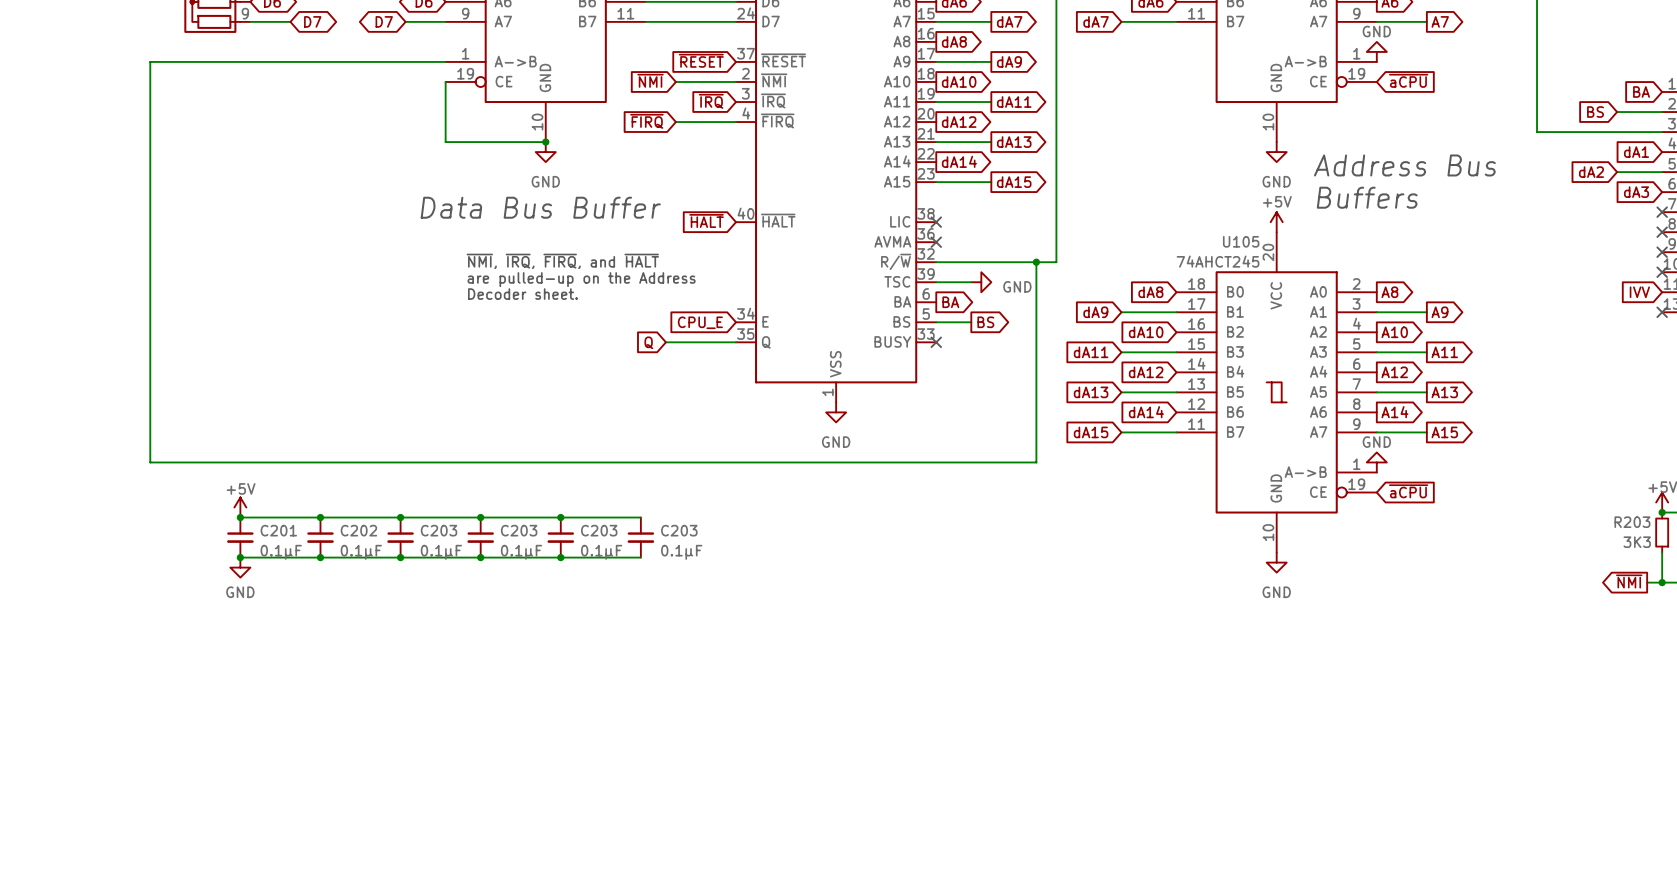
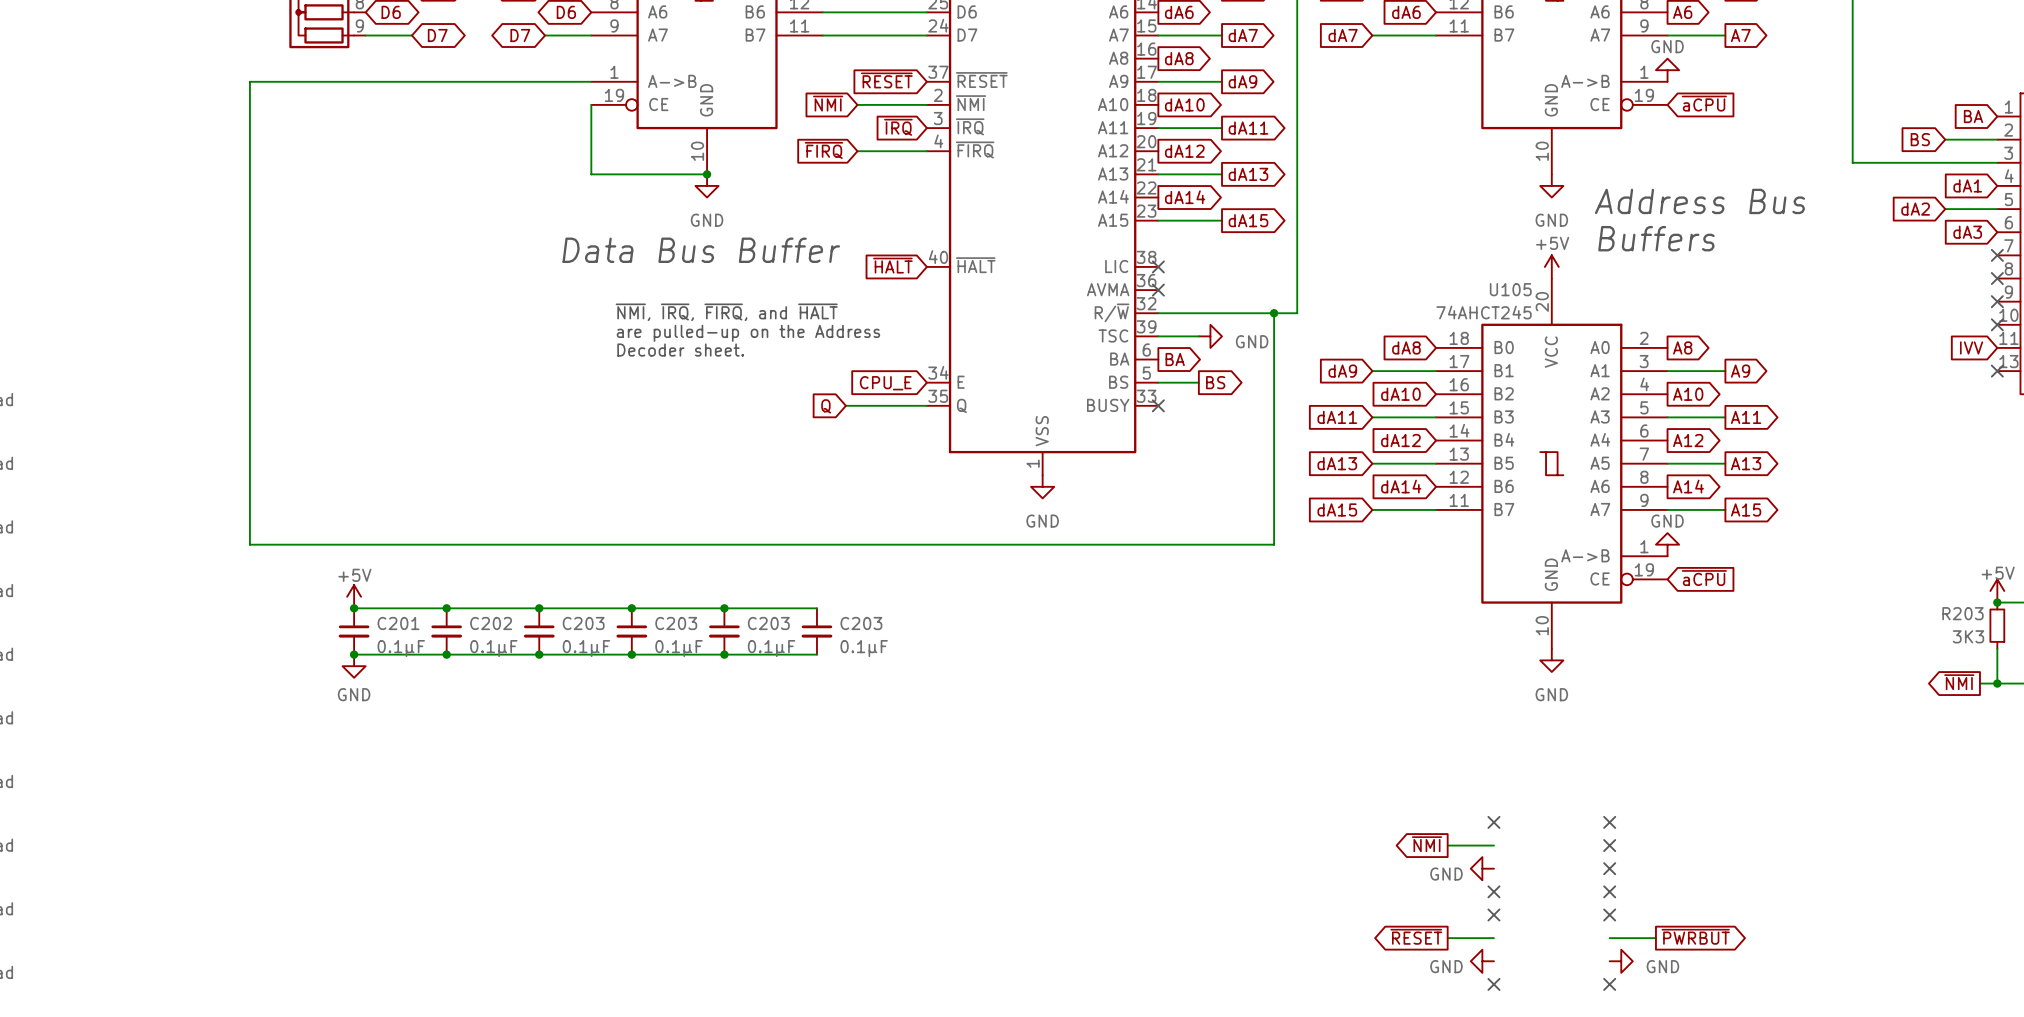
no-connect mark: none -> (1493, 822)
no-connect mark: none -> (1609, 822)
global label: none -> ~{NMI} (1426, 844)
wire: none -> (1447, 845) (1493, 845)
no-connect mark: none -> (1609, 845)
power symbol: none -> GND (1482, 868)
no-connect mark: none -> (1609, 868)
no-connect mark: none -> (1493, 891)
no-connect mark: none -> (1609, 891)
no-connect mark: none -> (1493, 914)
no-connect mark: none -> (1609, 914)
global label: none -> ~{RESET} (1416, 936)
global label: none -> ~{PWRBUT} (1695, 936)
wire: none -> (1447, 938) (1493, 938)
wire: none -> (1609, 938) (1655, 938)
power symbol: none -> GND (1482, 961)
power symbol: none -> GND (1621, 961)
no-connect mark: none -> (1493, 984)
no-connect mark: none -> (1609, 984)

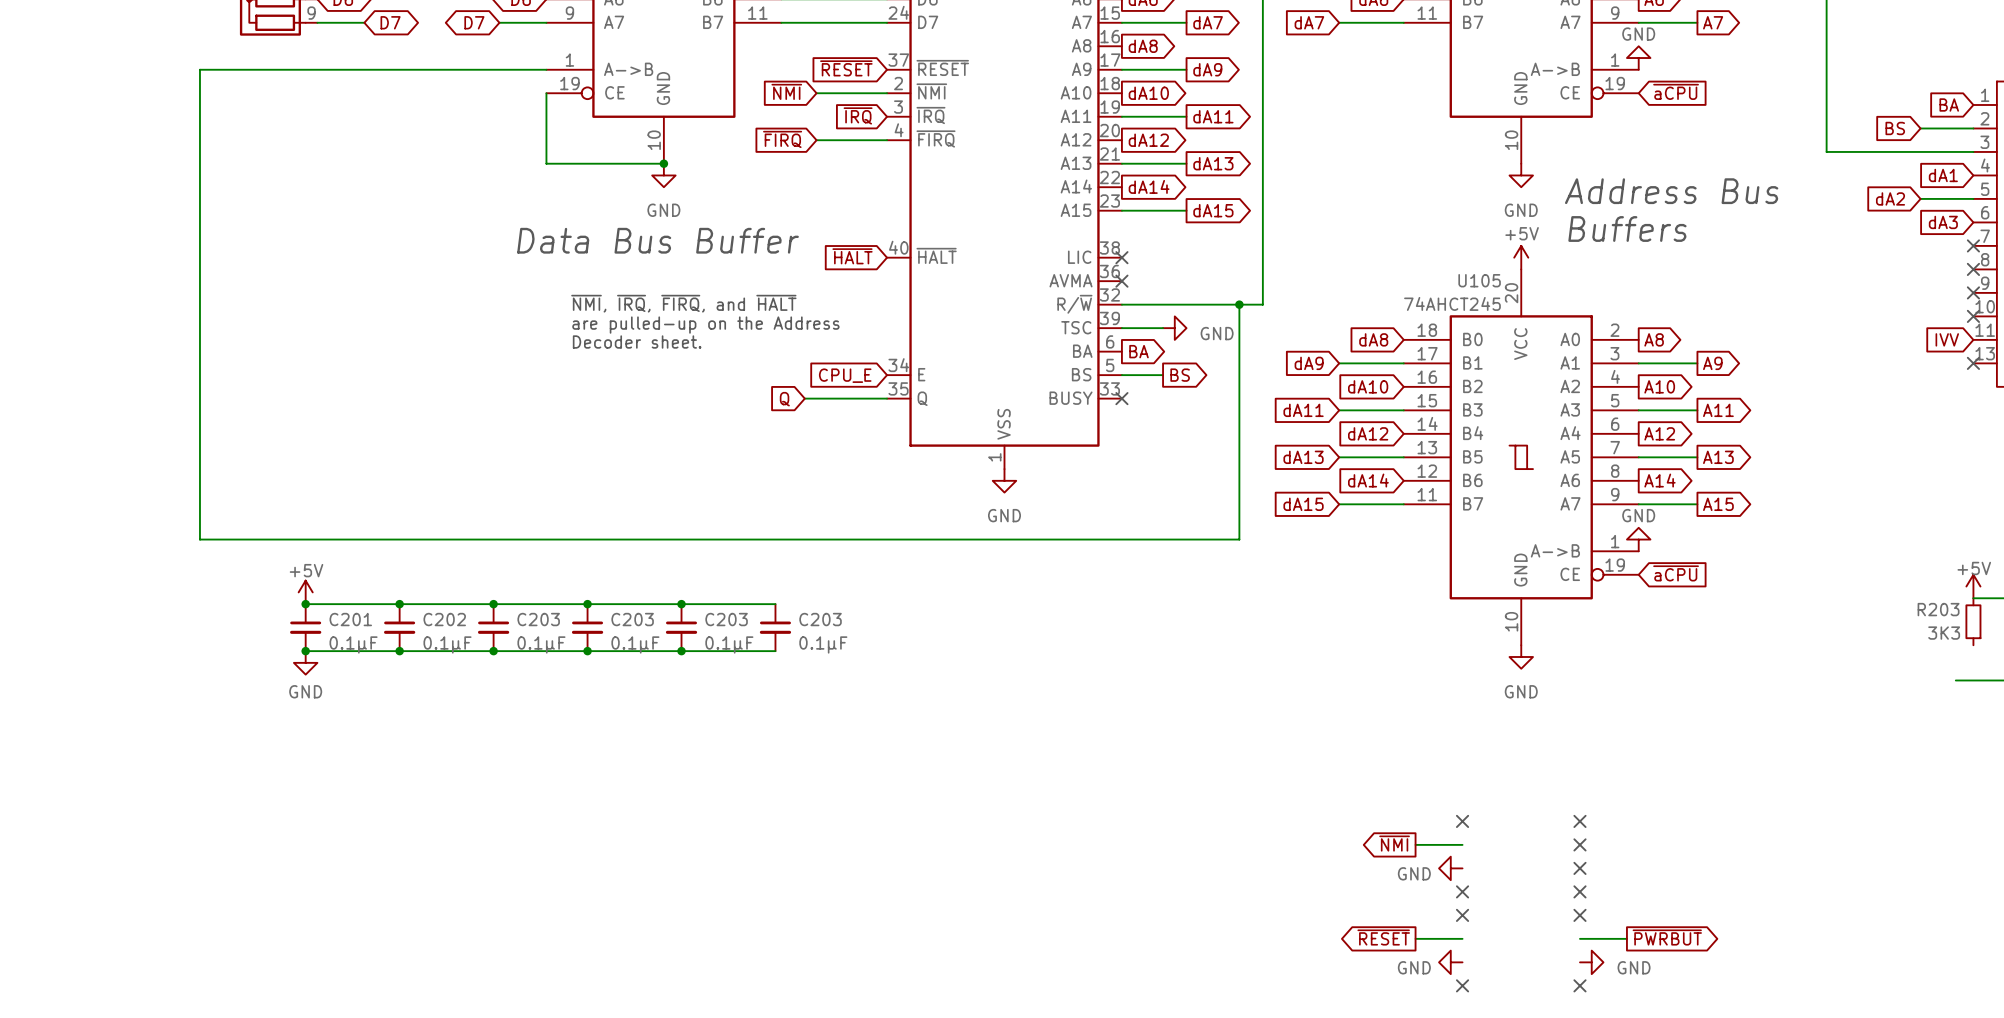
junction: (1997, 602) -> none
wire: (1997, 648) (1997, 683) -> none
global label: ~{NMI} (1959, 682) -> none
junction: (1997, 683) -> none

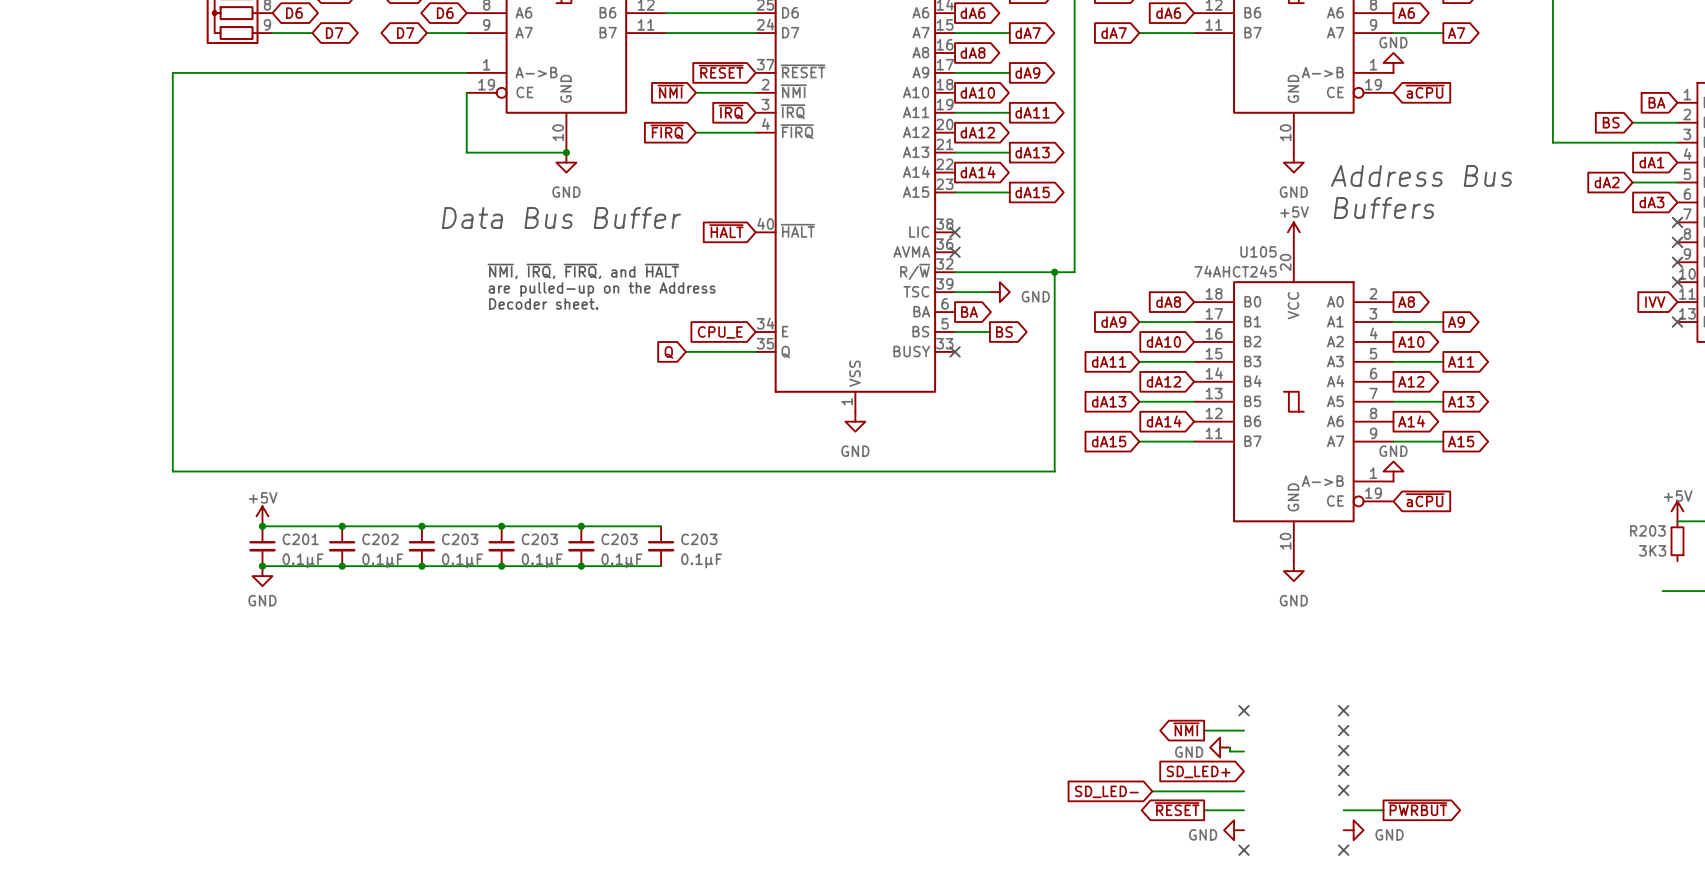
wire: none -> (1230, 747) (1230, 751) (1244, 751)
power symbol position: GND (1450, 868) -> GND (1220, 747)
no-connect mark: (1462, 891) -> none
global label: none -> SD_LED+ (1198, 771)
no-connect mark: (1462, 915) -> none
wire: none -> (1152, 791) (1244, 791)
global label: none -> SD_LED- (1106, 791)

